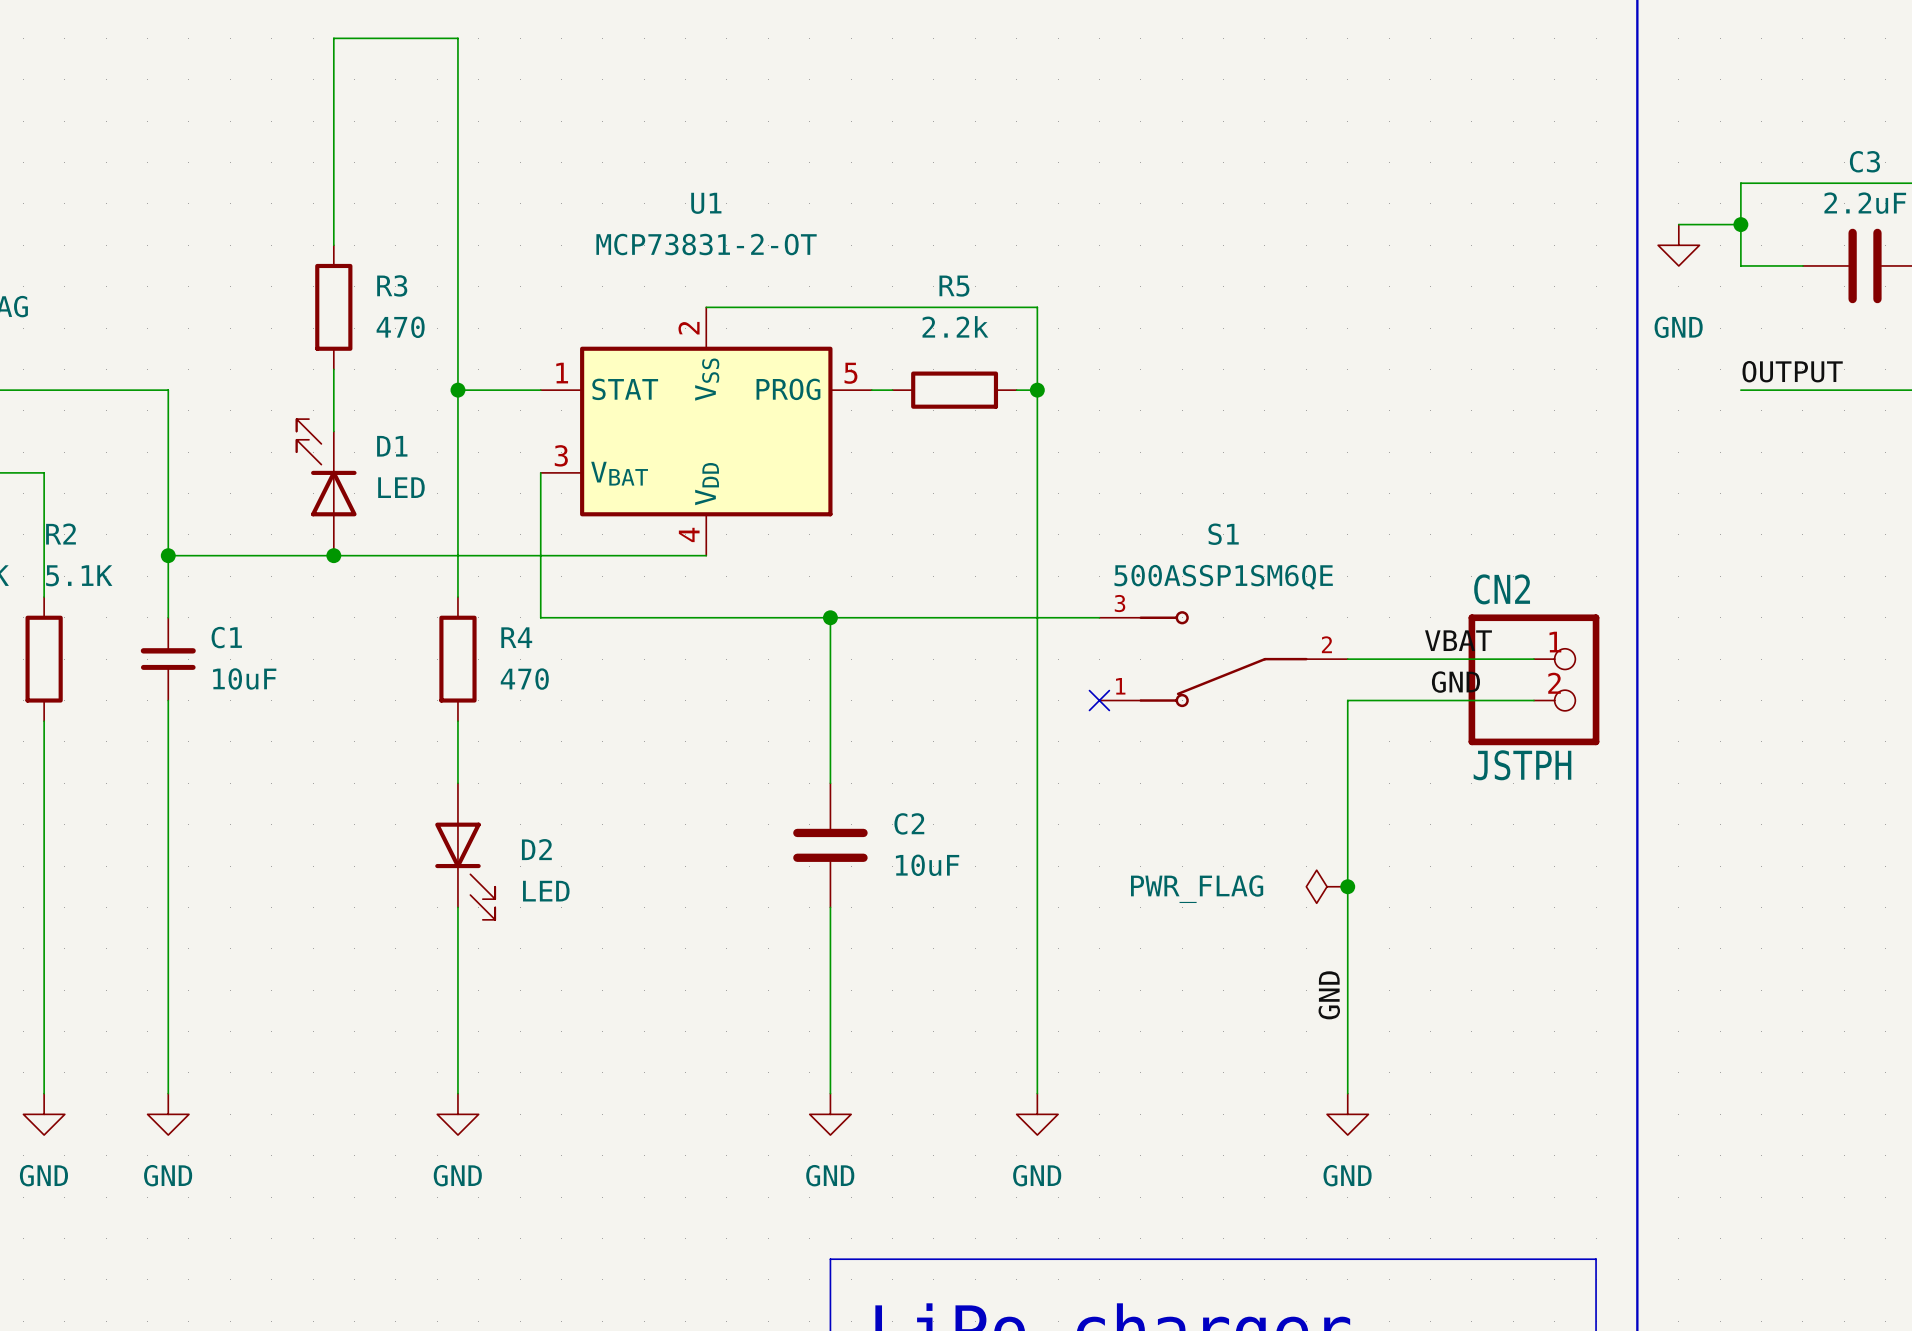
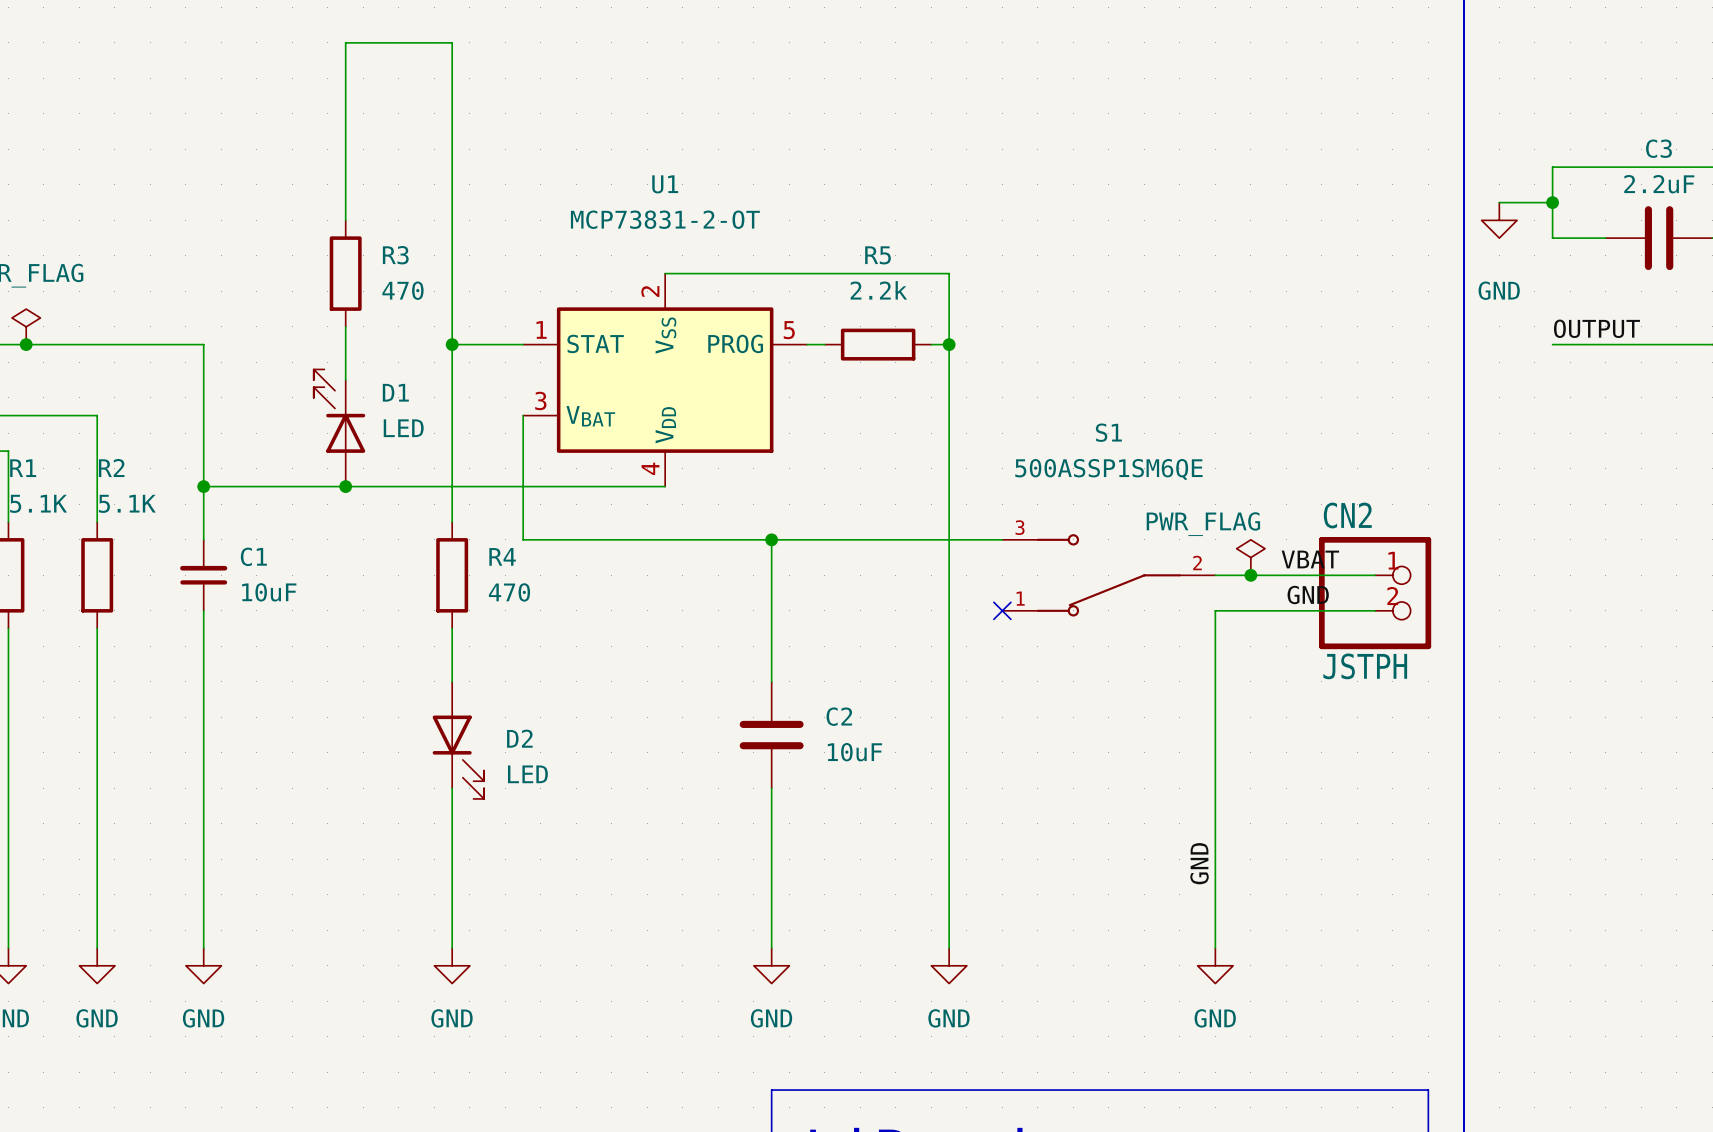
S1 name position: S1 (1223, 534) -> S1 (1108, 432)
S1 value position: 500ASSP1SM6QE (1223, 577) -> 500ASSP1SM6QE (1108, 469)
junction: none -> (1250, 575)
power symbol rotation: 0° (1327, 886) -> 90° clockwise (1250, 557)
power symbol position: PWR_FLAG (1327, 886) -> PWR_FLAG (1250, 557)
junction: (1347, 886) -> none
power symbol text position: PWR_FLAG (1197, 889) -> PWR_FLAG (1203, 524)

